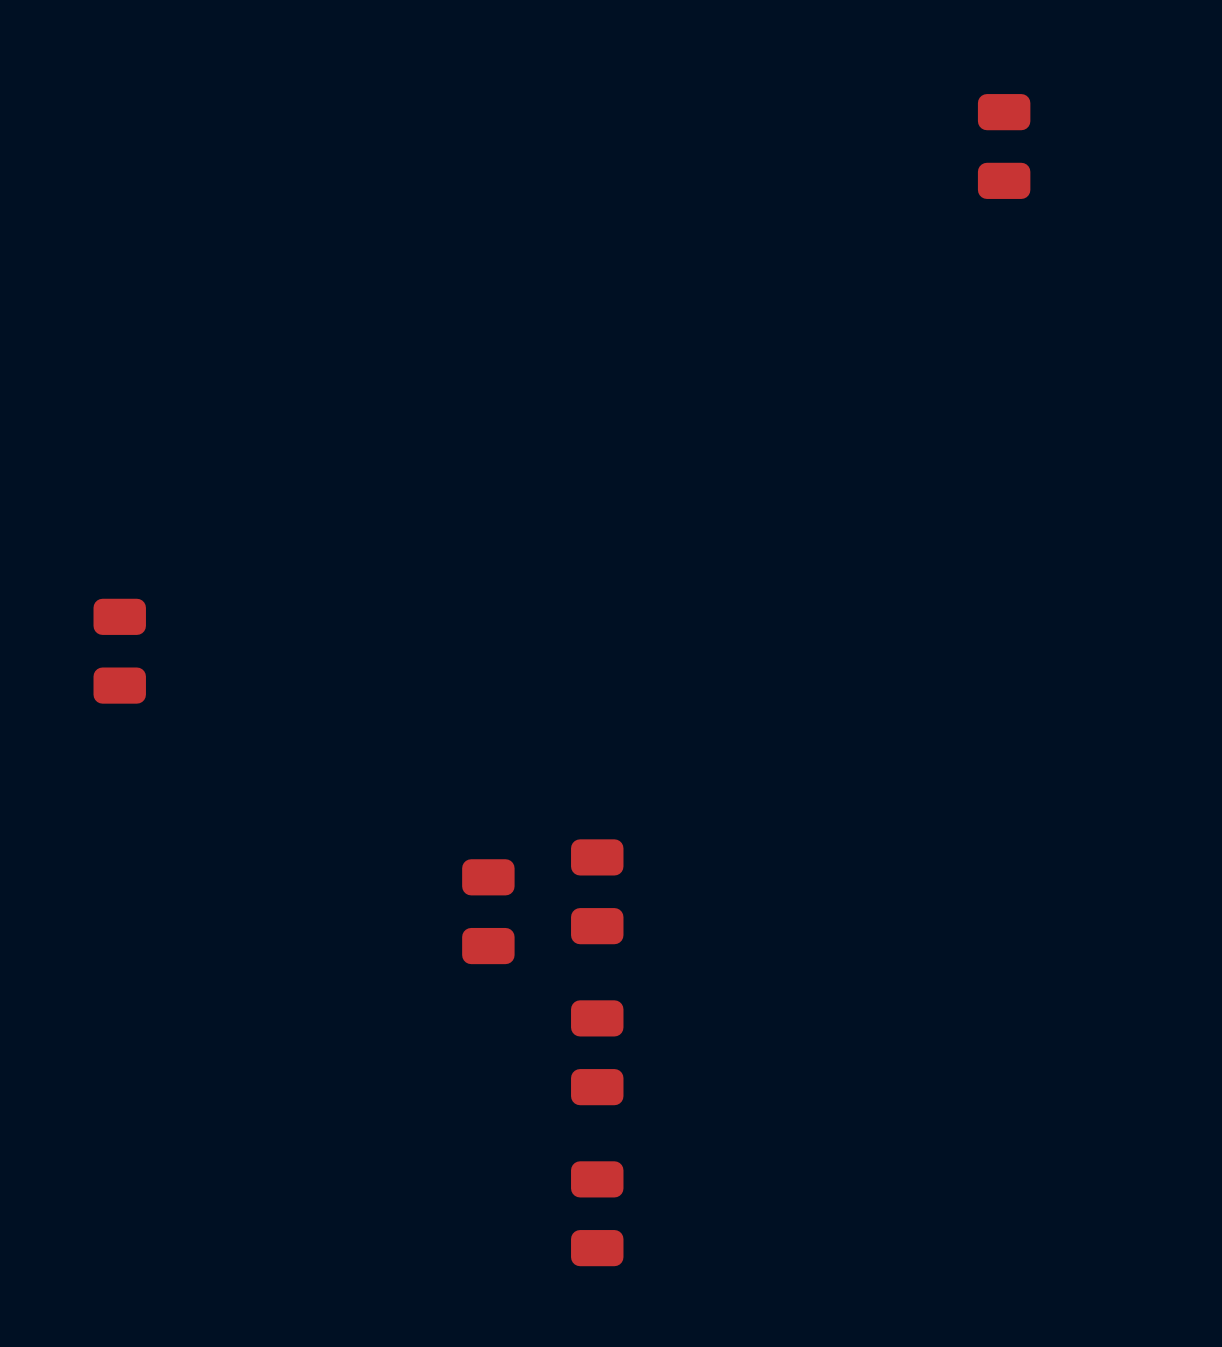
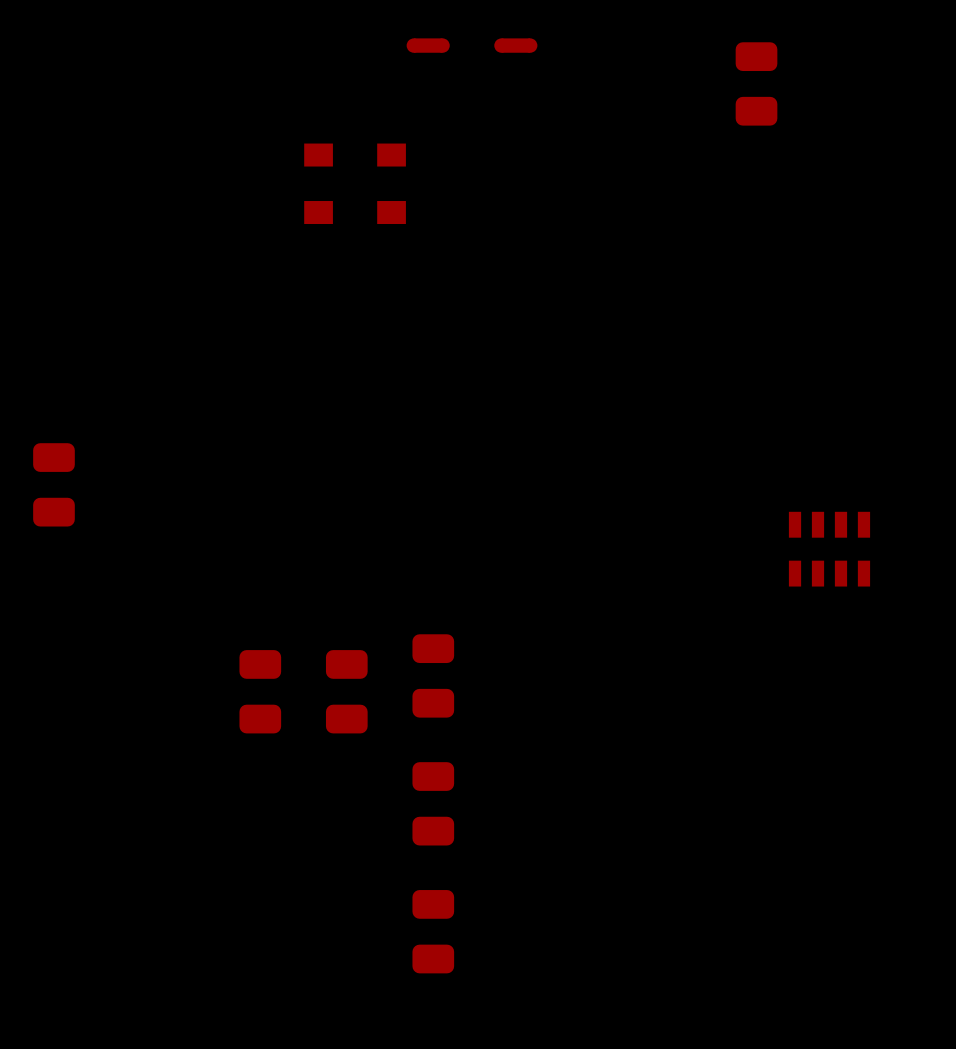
part: none -> (428, 45)
part: none -> (515, 45)
part: none -> (318, 183)
part: none -> (391, 183)
part: none -> (829, 549)
part: none -> (260, 691)

